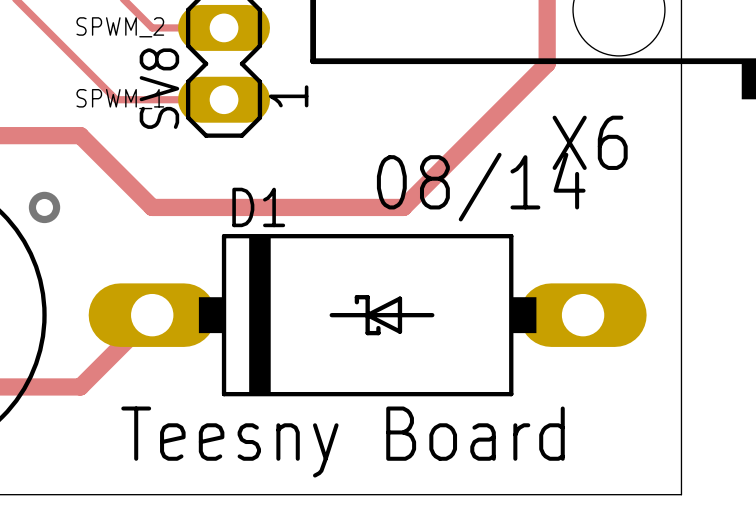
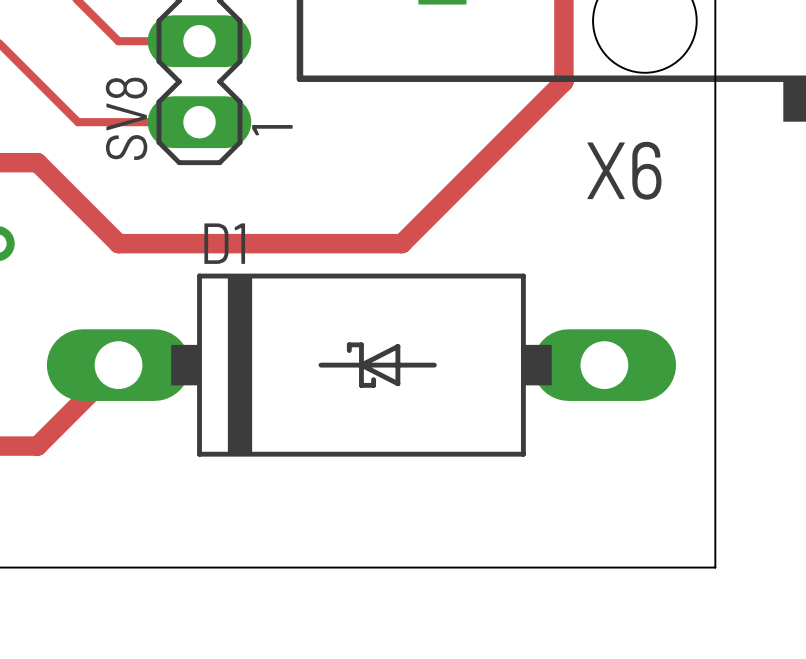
text: SPWM_2 (120, 27) -> none
text: SPWM_1 (120, 99) -> none
text: 08/14 (481, 187) -> none
text: Teesny Board (343, 442) -> none

